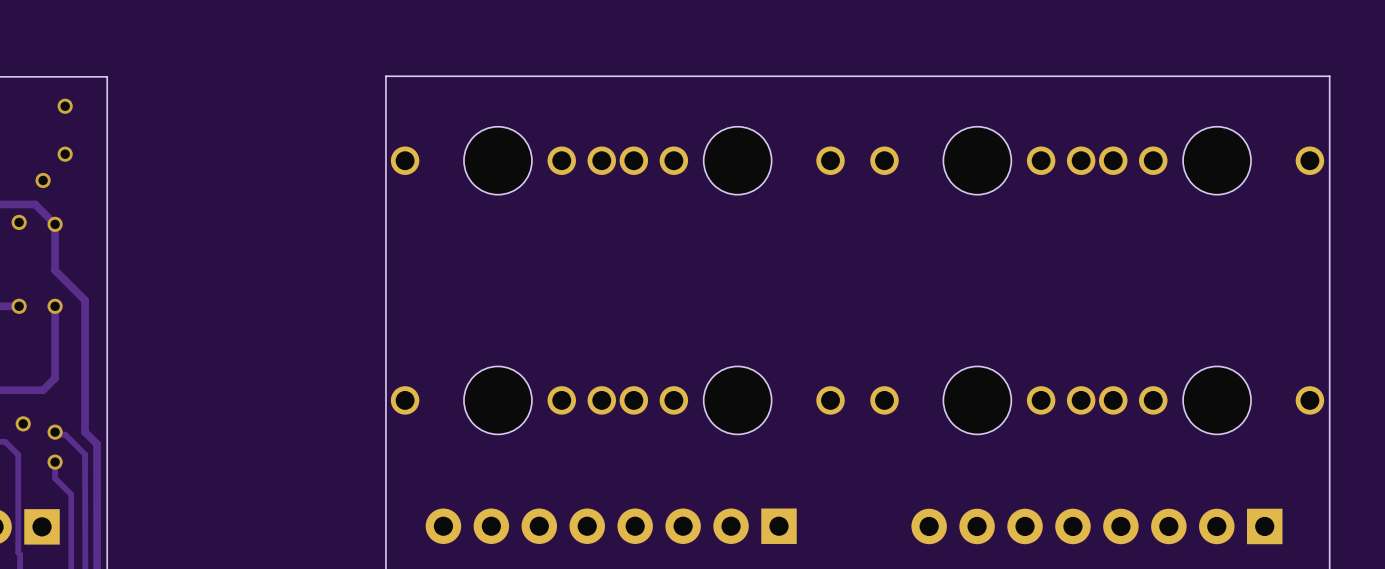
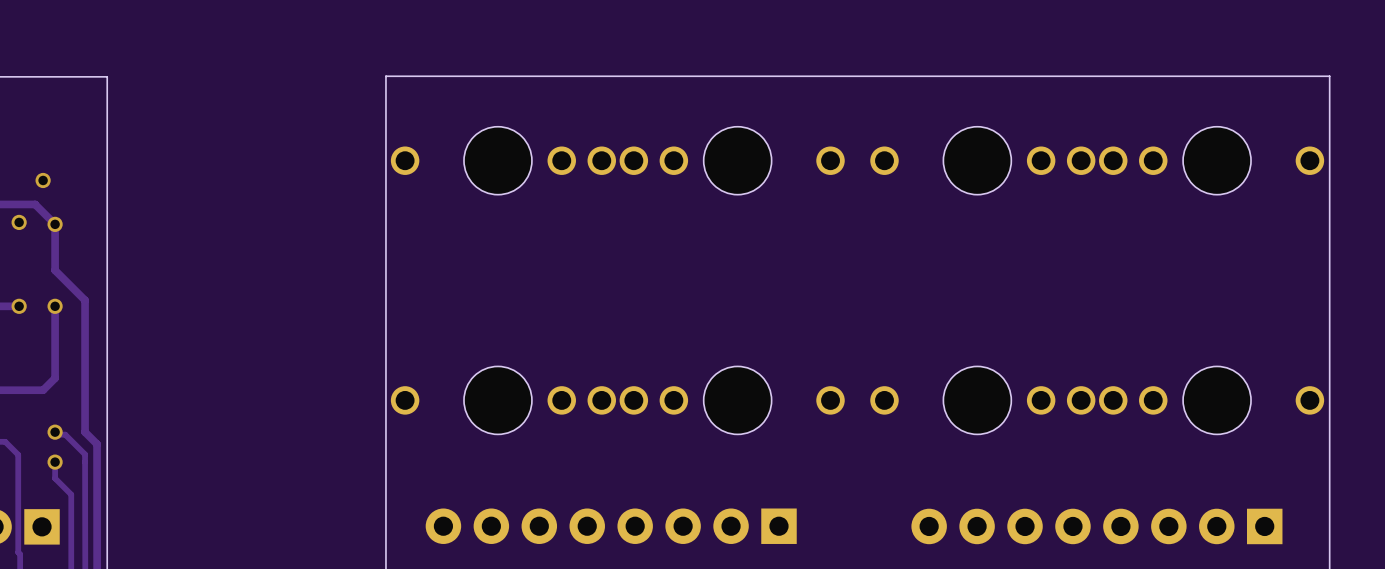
via: (65, 106) -> none
via: (65, 154) -> none
via: (23, 423) -> none

